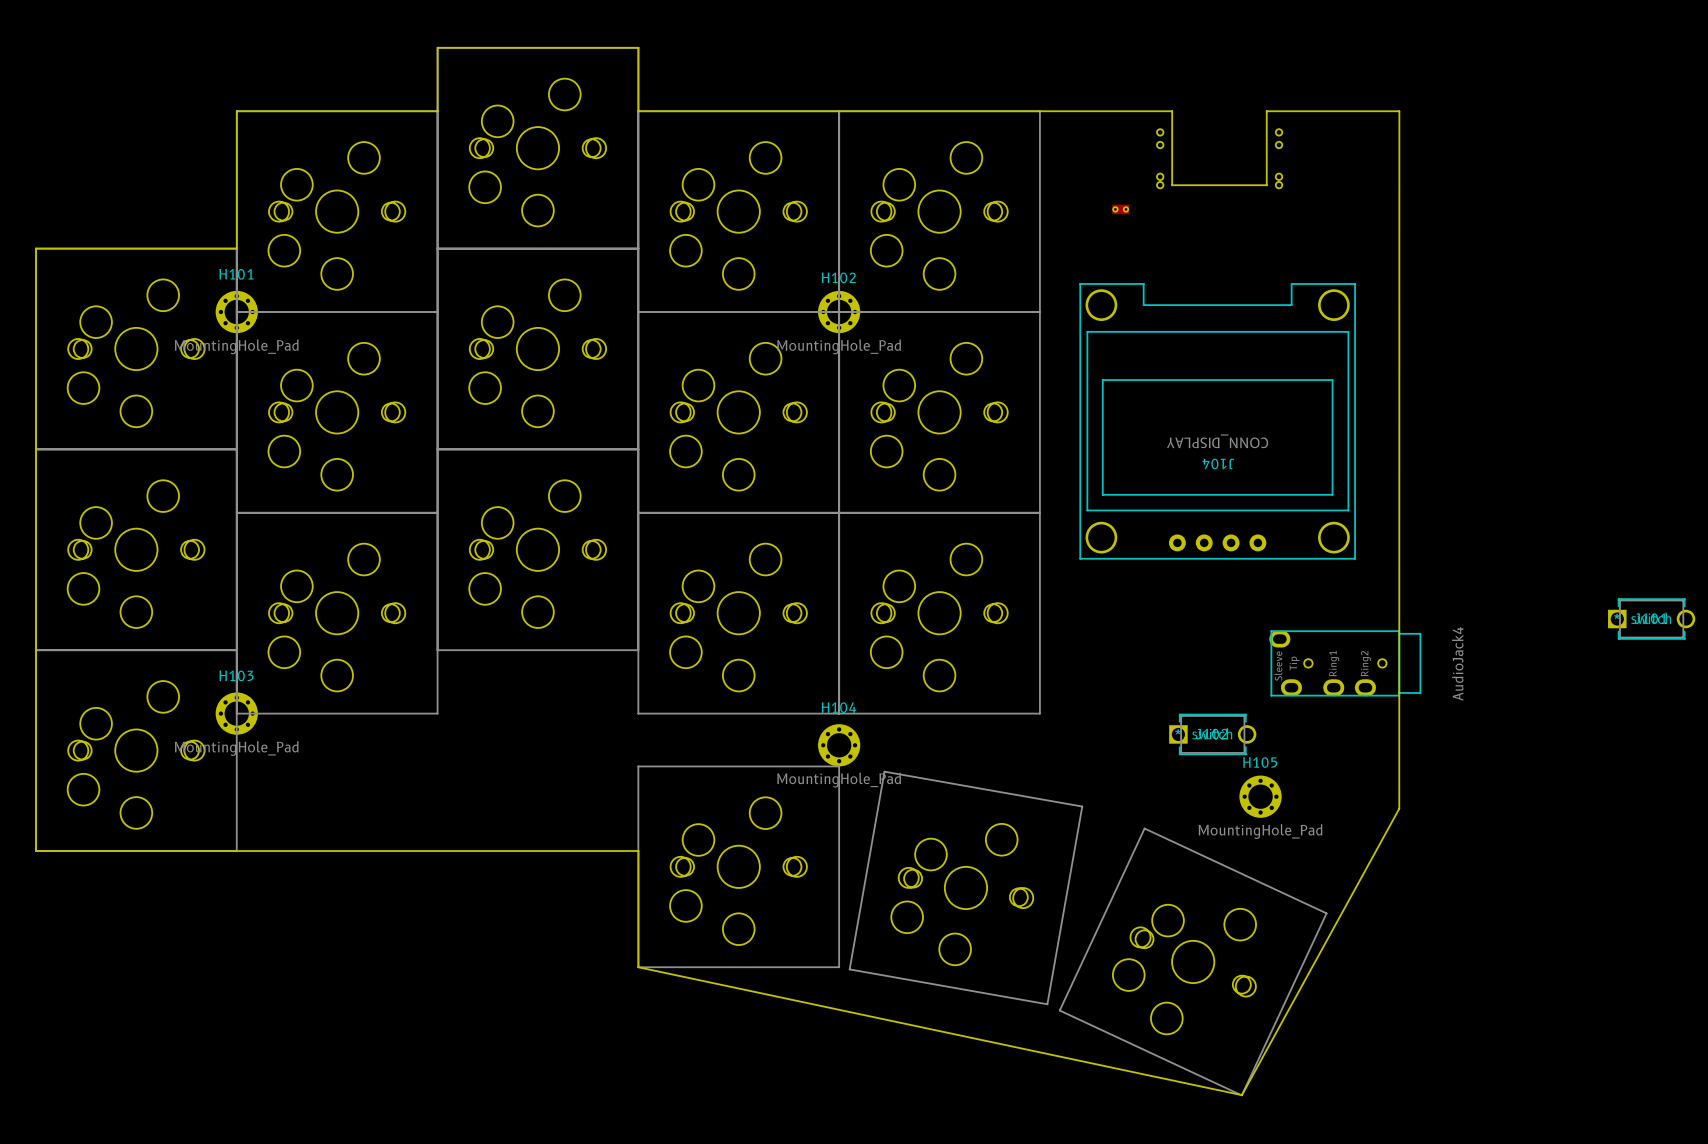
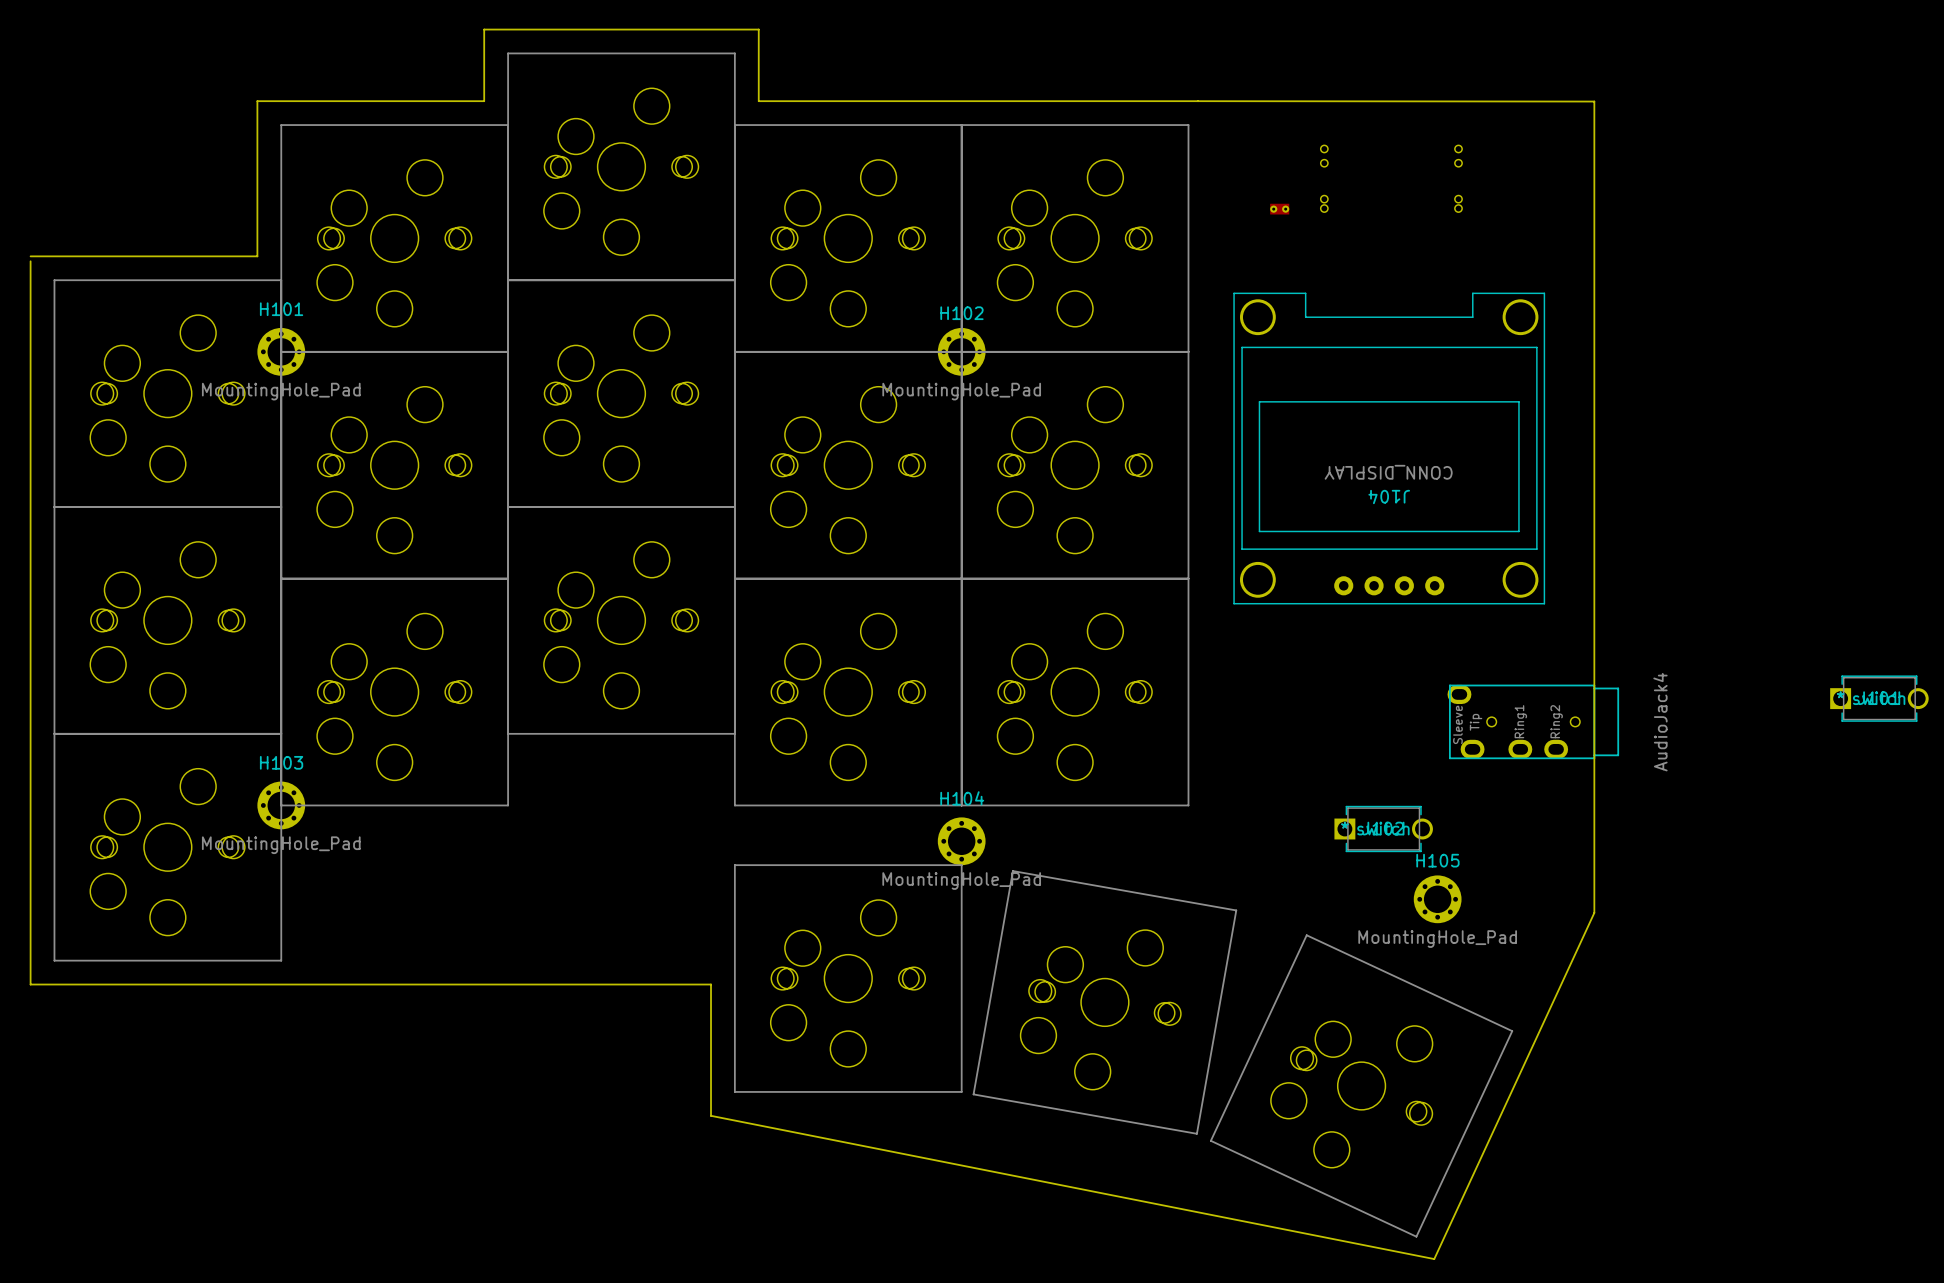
board edge: (437, 47) (437, 111) (236, 111) (236, 248) (36, 248) (36, 851) (638, 851) (638, 967) (1241, 1095) (1399, 808) (1399, 111) (1266, 111) (1266, 185) (1172, 185) (1172, 111) (638, 111) (638, 47) (437, 47) -> none
part position: (1120, 209) -> (1279, 209)
board edge: none -> (30, 256) (257, 256) (257, 101) (484, 101) (484, 29) (758, 29) (758, 101) (1594, 101) (1594, 912) (1434, 1259) (711, 1115) (711, 984) (30, 984) (30, 261)
J104 position: (1217, 421) -> (1389, 448)
part position: (1345, 663) -> (1533, 721)

